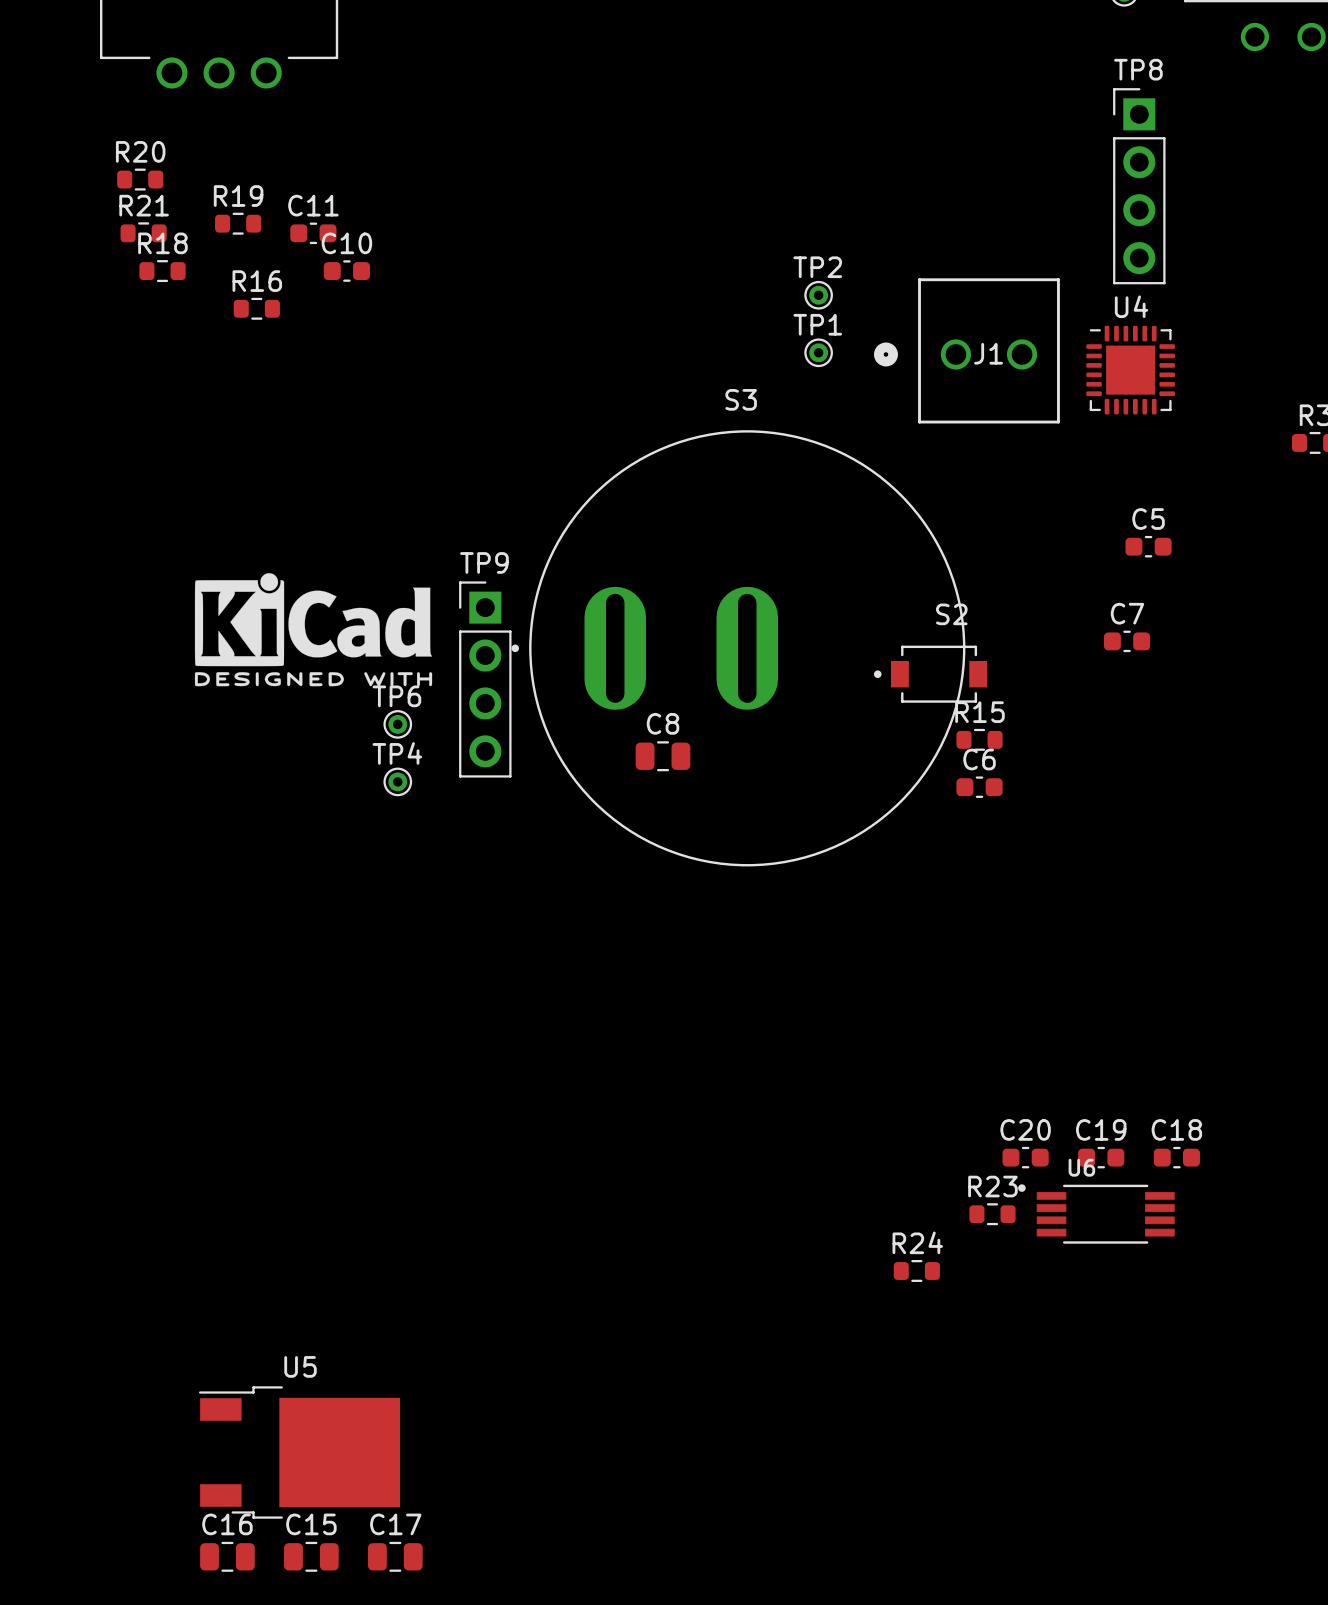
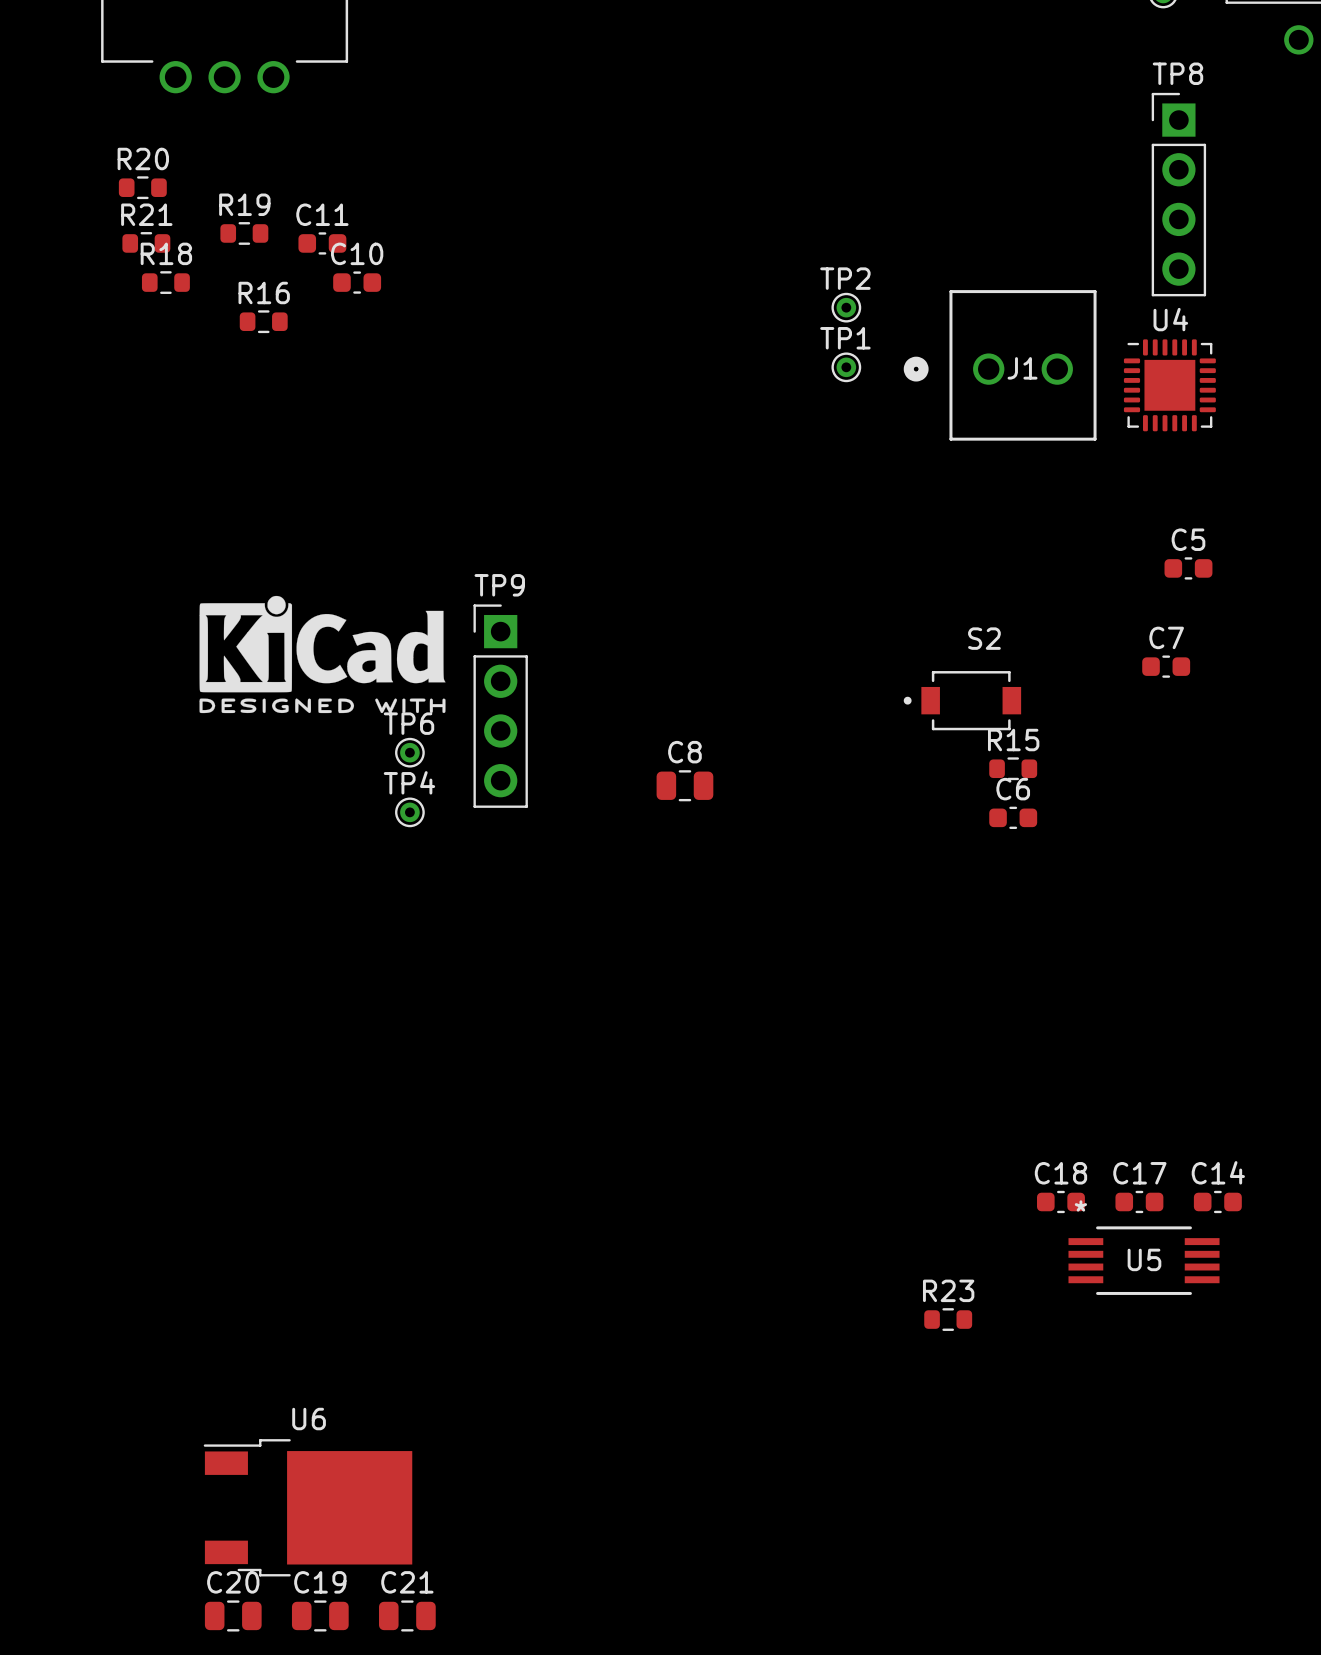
S3: (738, 648) -> none
C20 name: C20 (1025, 1129) -> C18 (1060, 1173)
C19 name: C19 (1101, 1129) -> C17 (1139, 1173)
C18 name: C18 (1176, 1129) -> C14 (1218, 1172)
R23: (992, 1214) -> none
U6: (1096, 1214) -> none
U5: none -> (1144, 1260)
R24 name: R24 (917, 1242) -> R23 (948, 1290)
U5 name: U5 (300, 1366) -> U6 (309, 1419)
C16 name: C16 (227, 1524) -> C20 (233, 1582)
C15 name: C15 (311, 1524) -> C19 (320, 1582)
C17 name: C17 (395, 1524) -> C21 (407, 1582)

